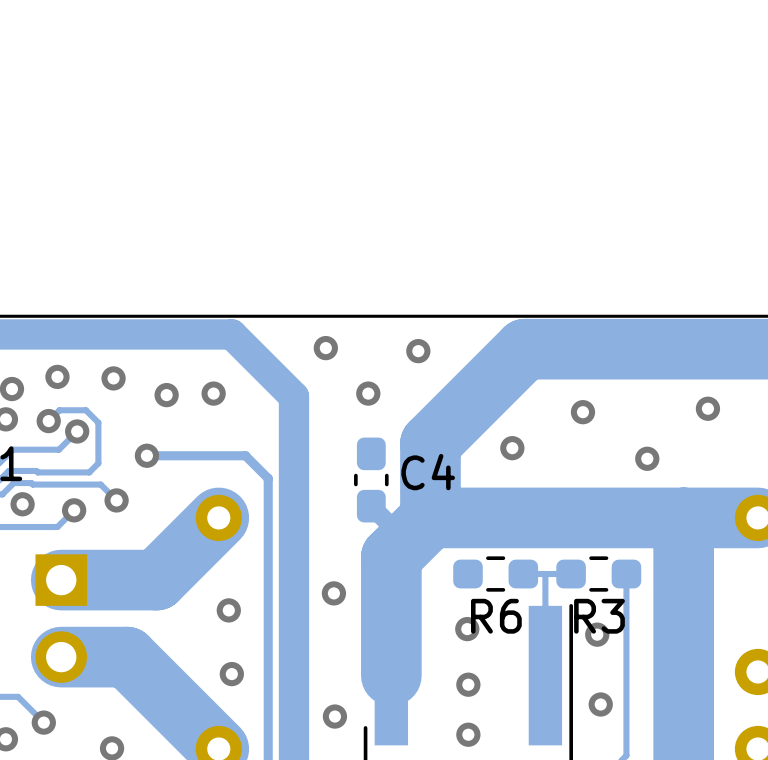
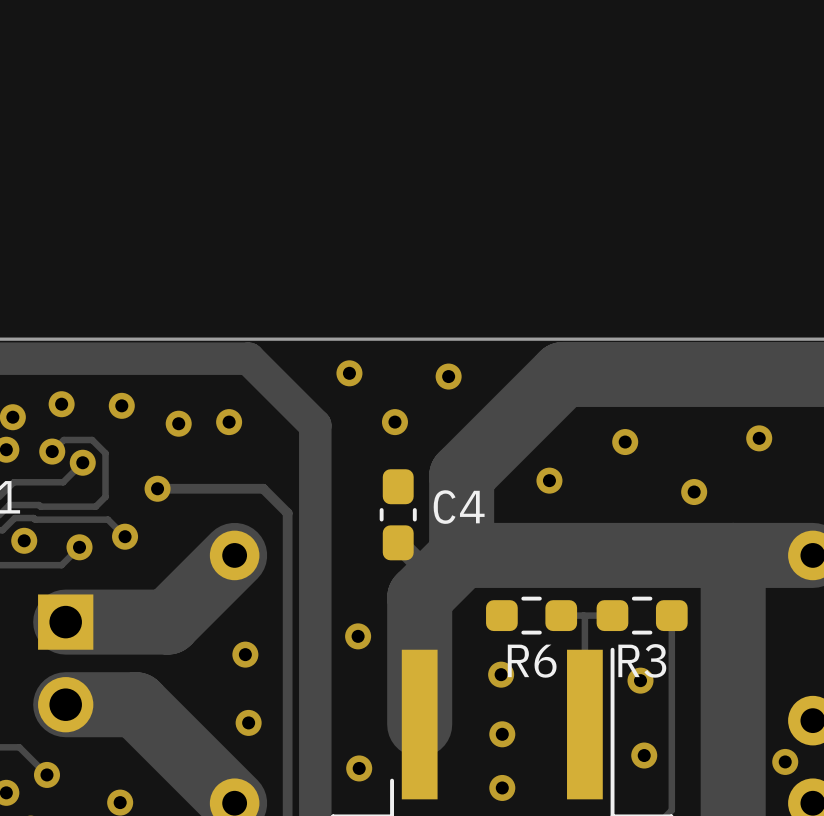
via: none -> (785, 761)

